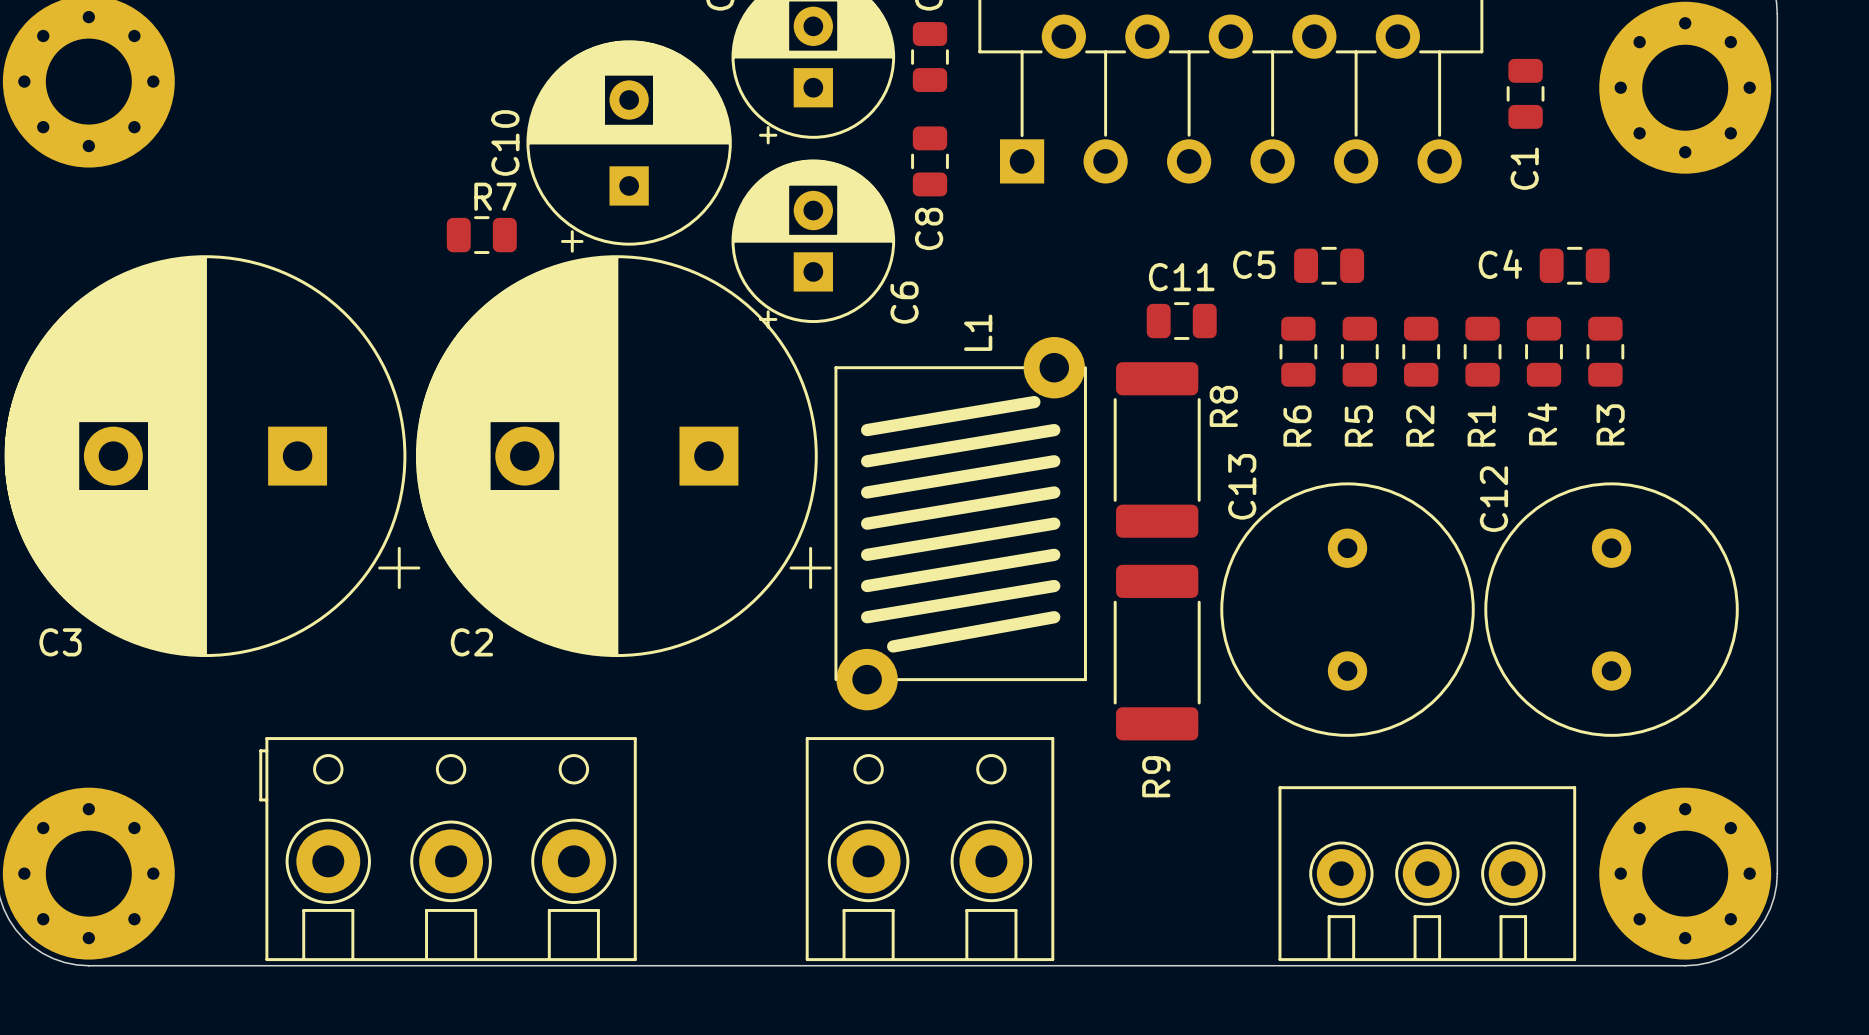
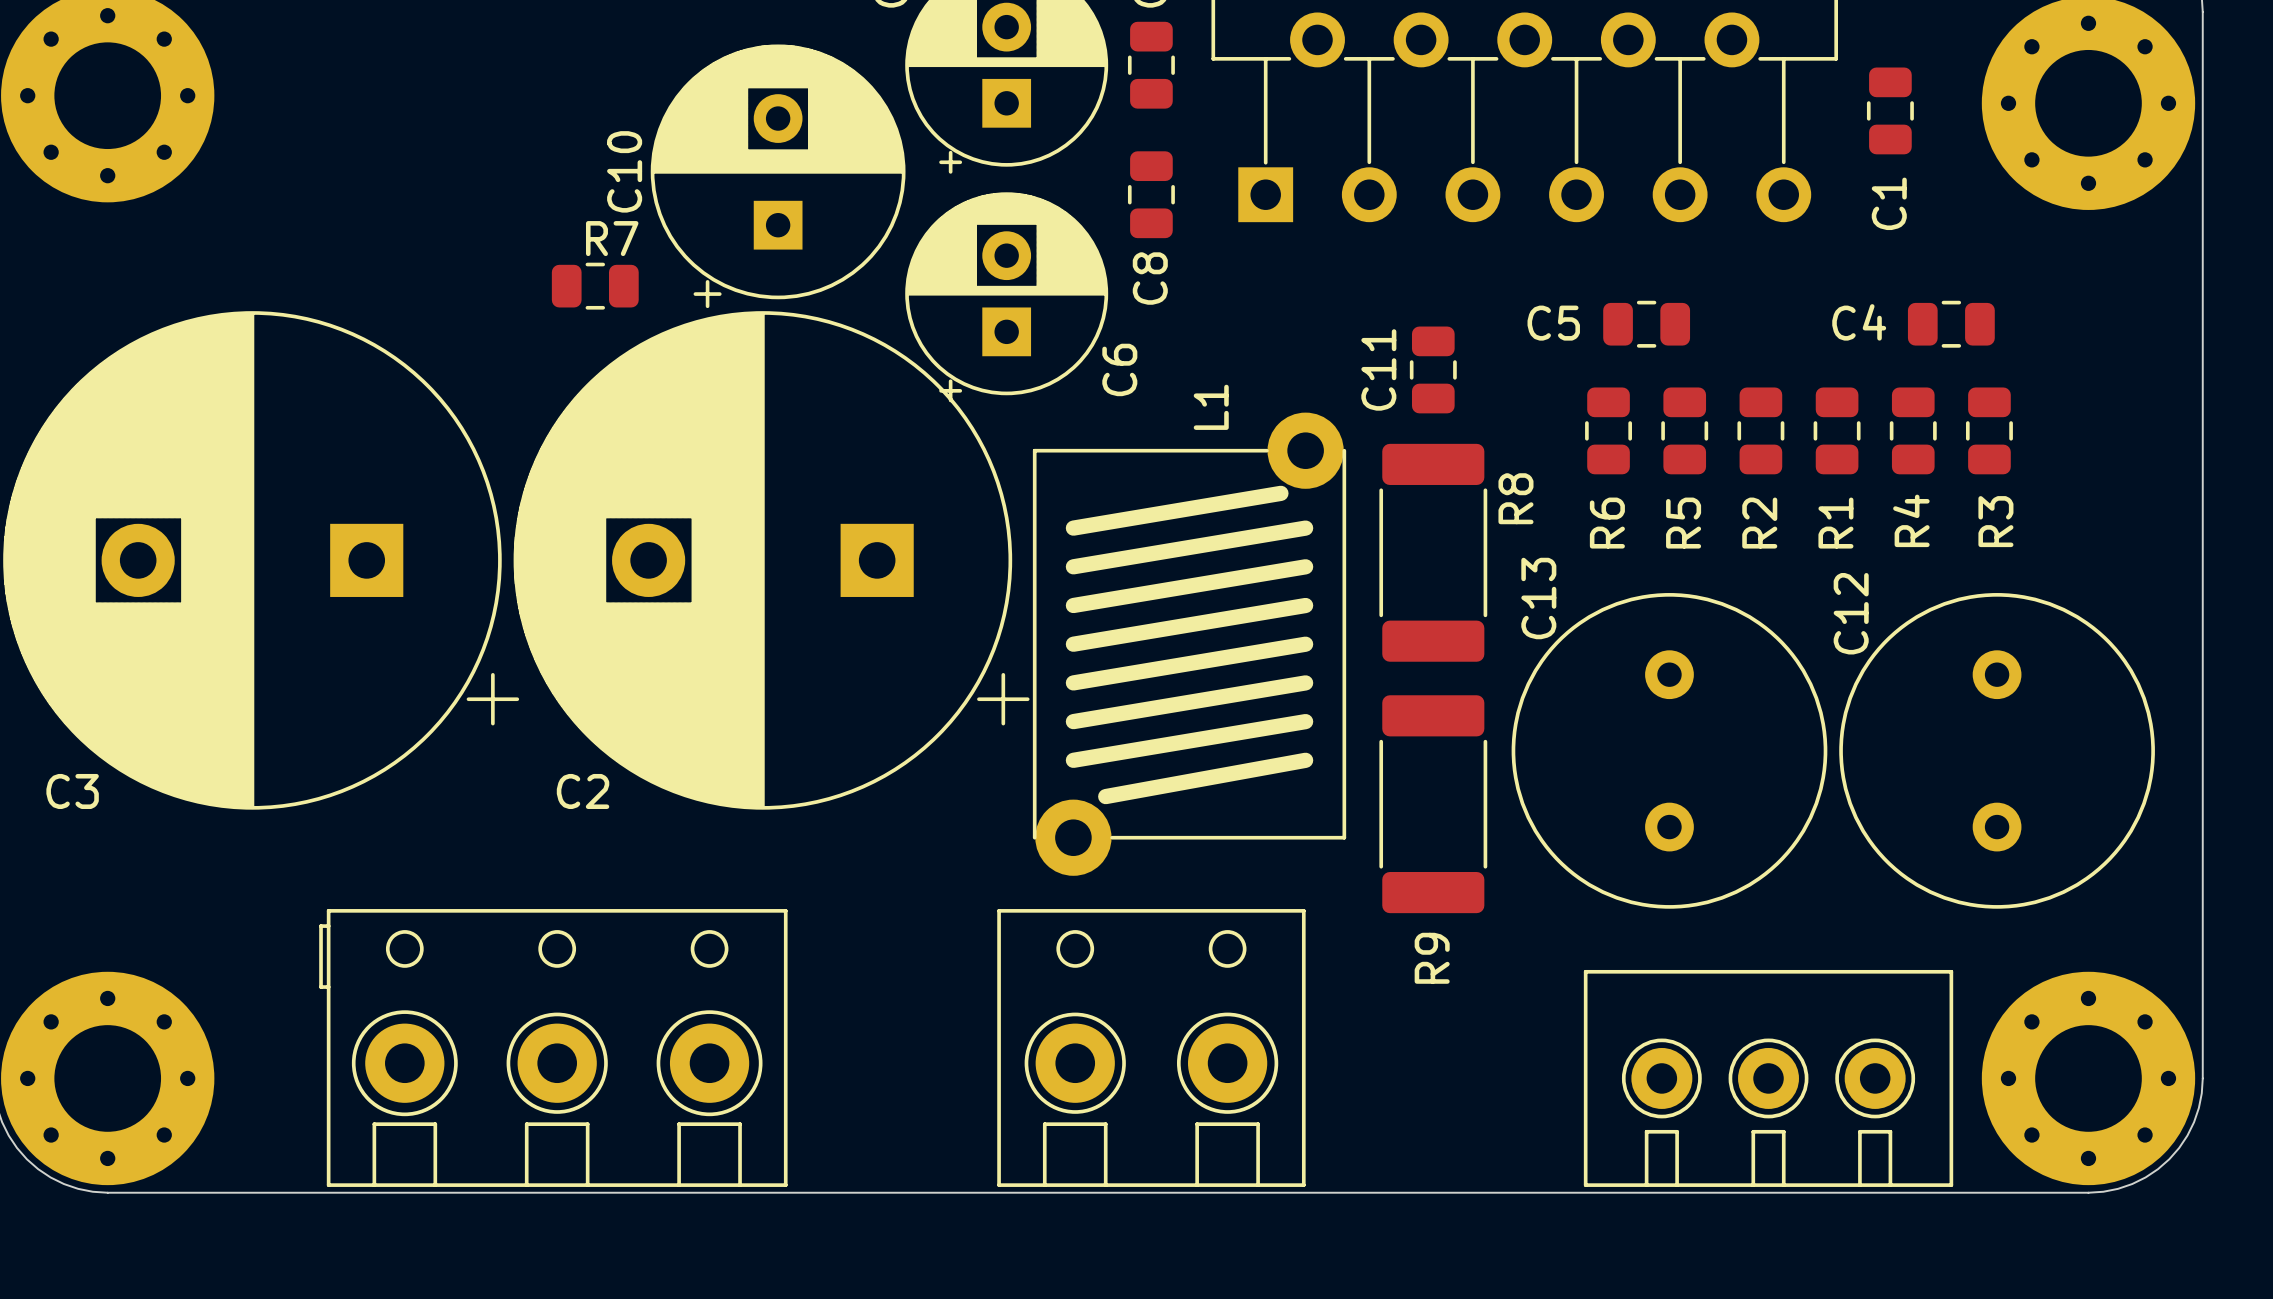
C11 name position: C11 (1181, 277) -> C11 (1378, 369)
C11 rotation: 0° (1181, 321) -> 90° clockwise (1433, 369)

